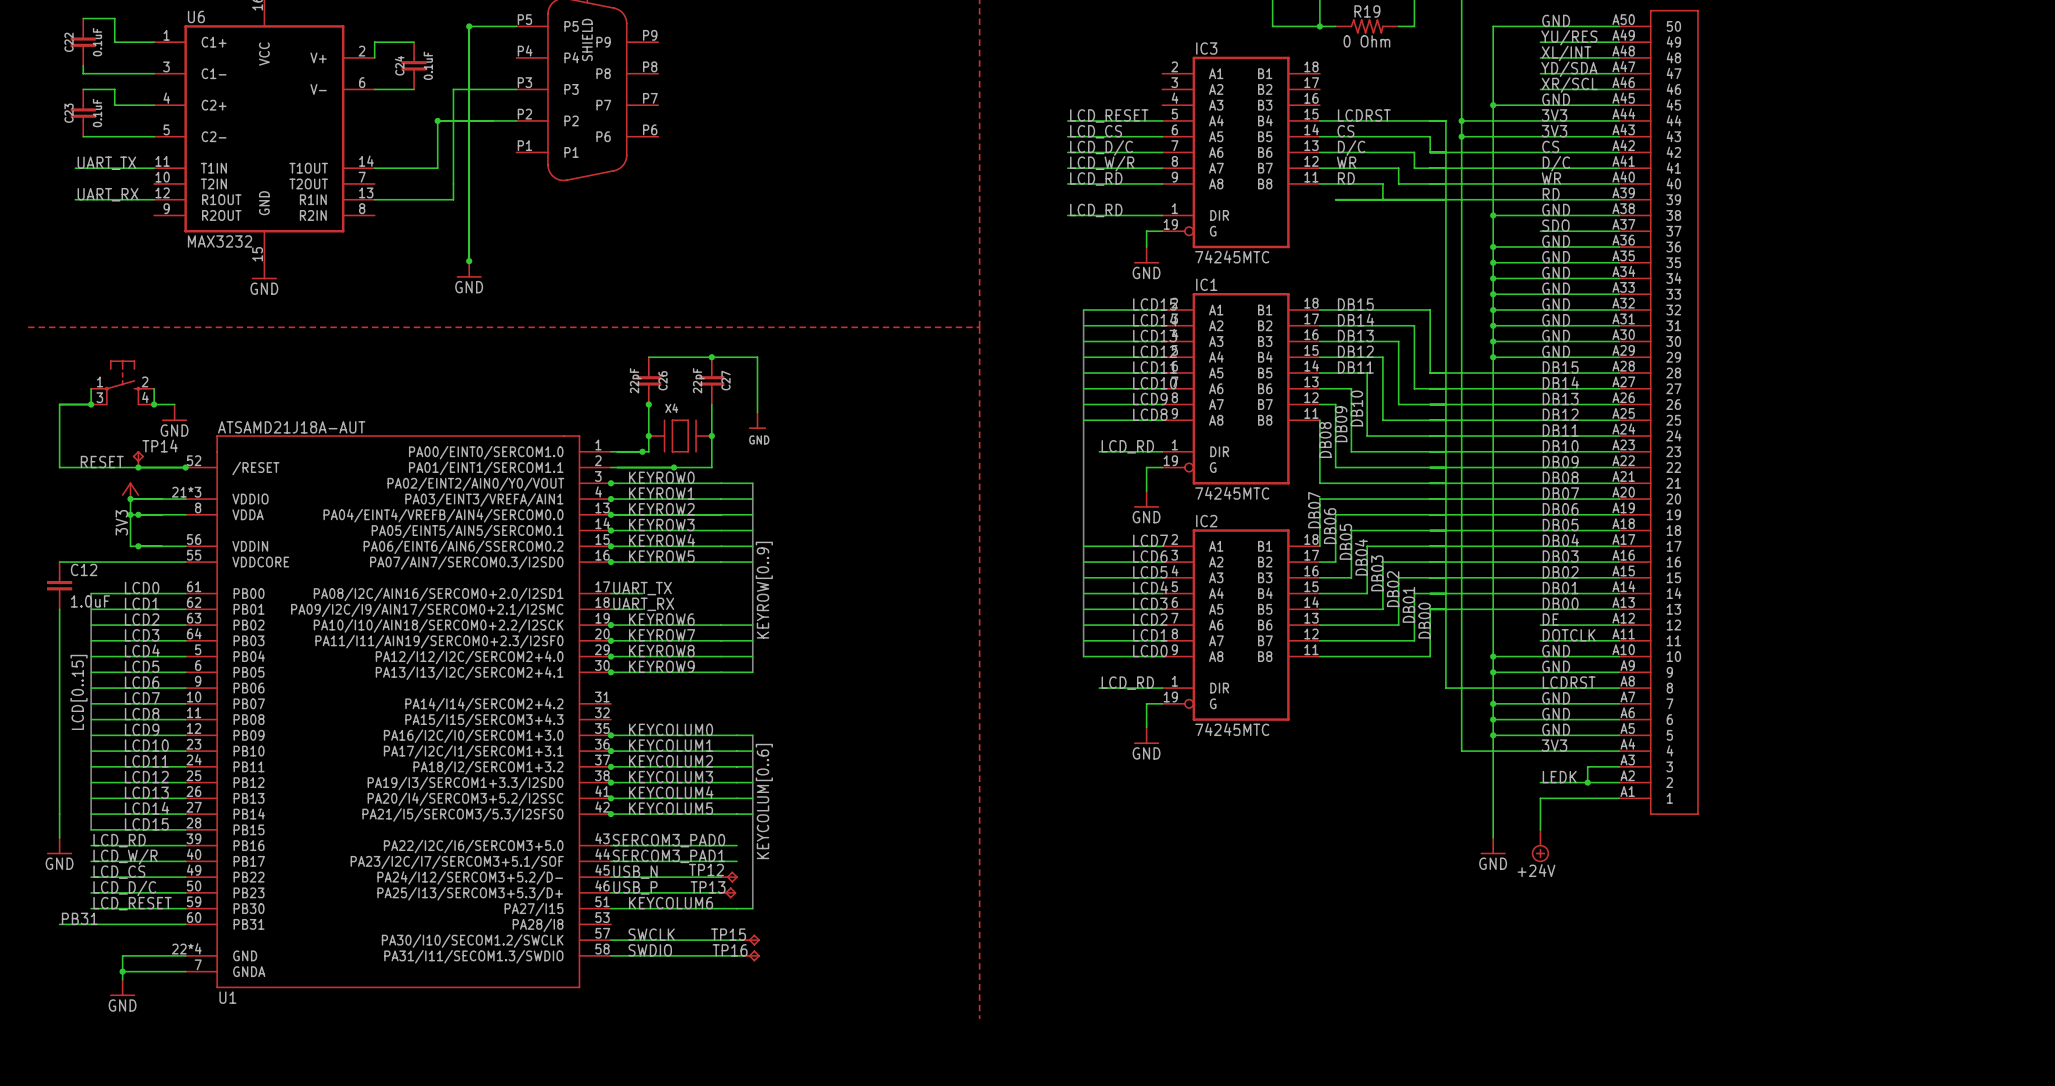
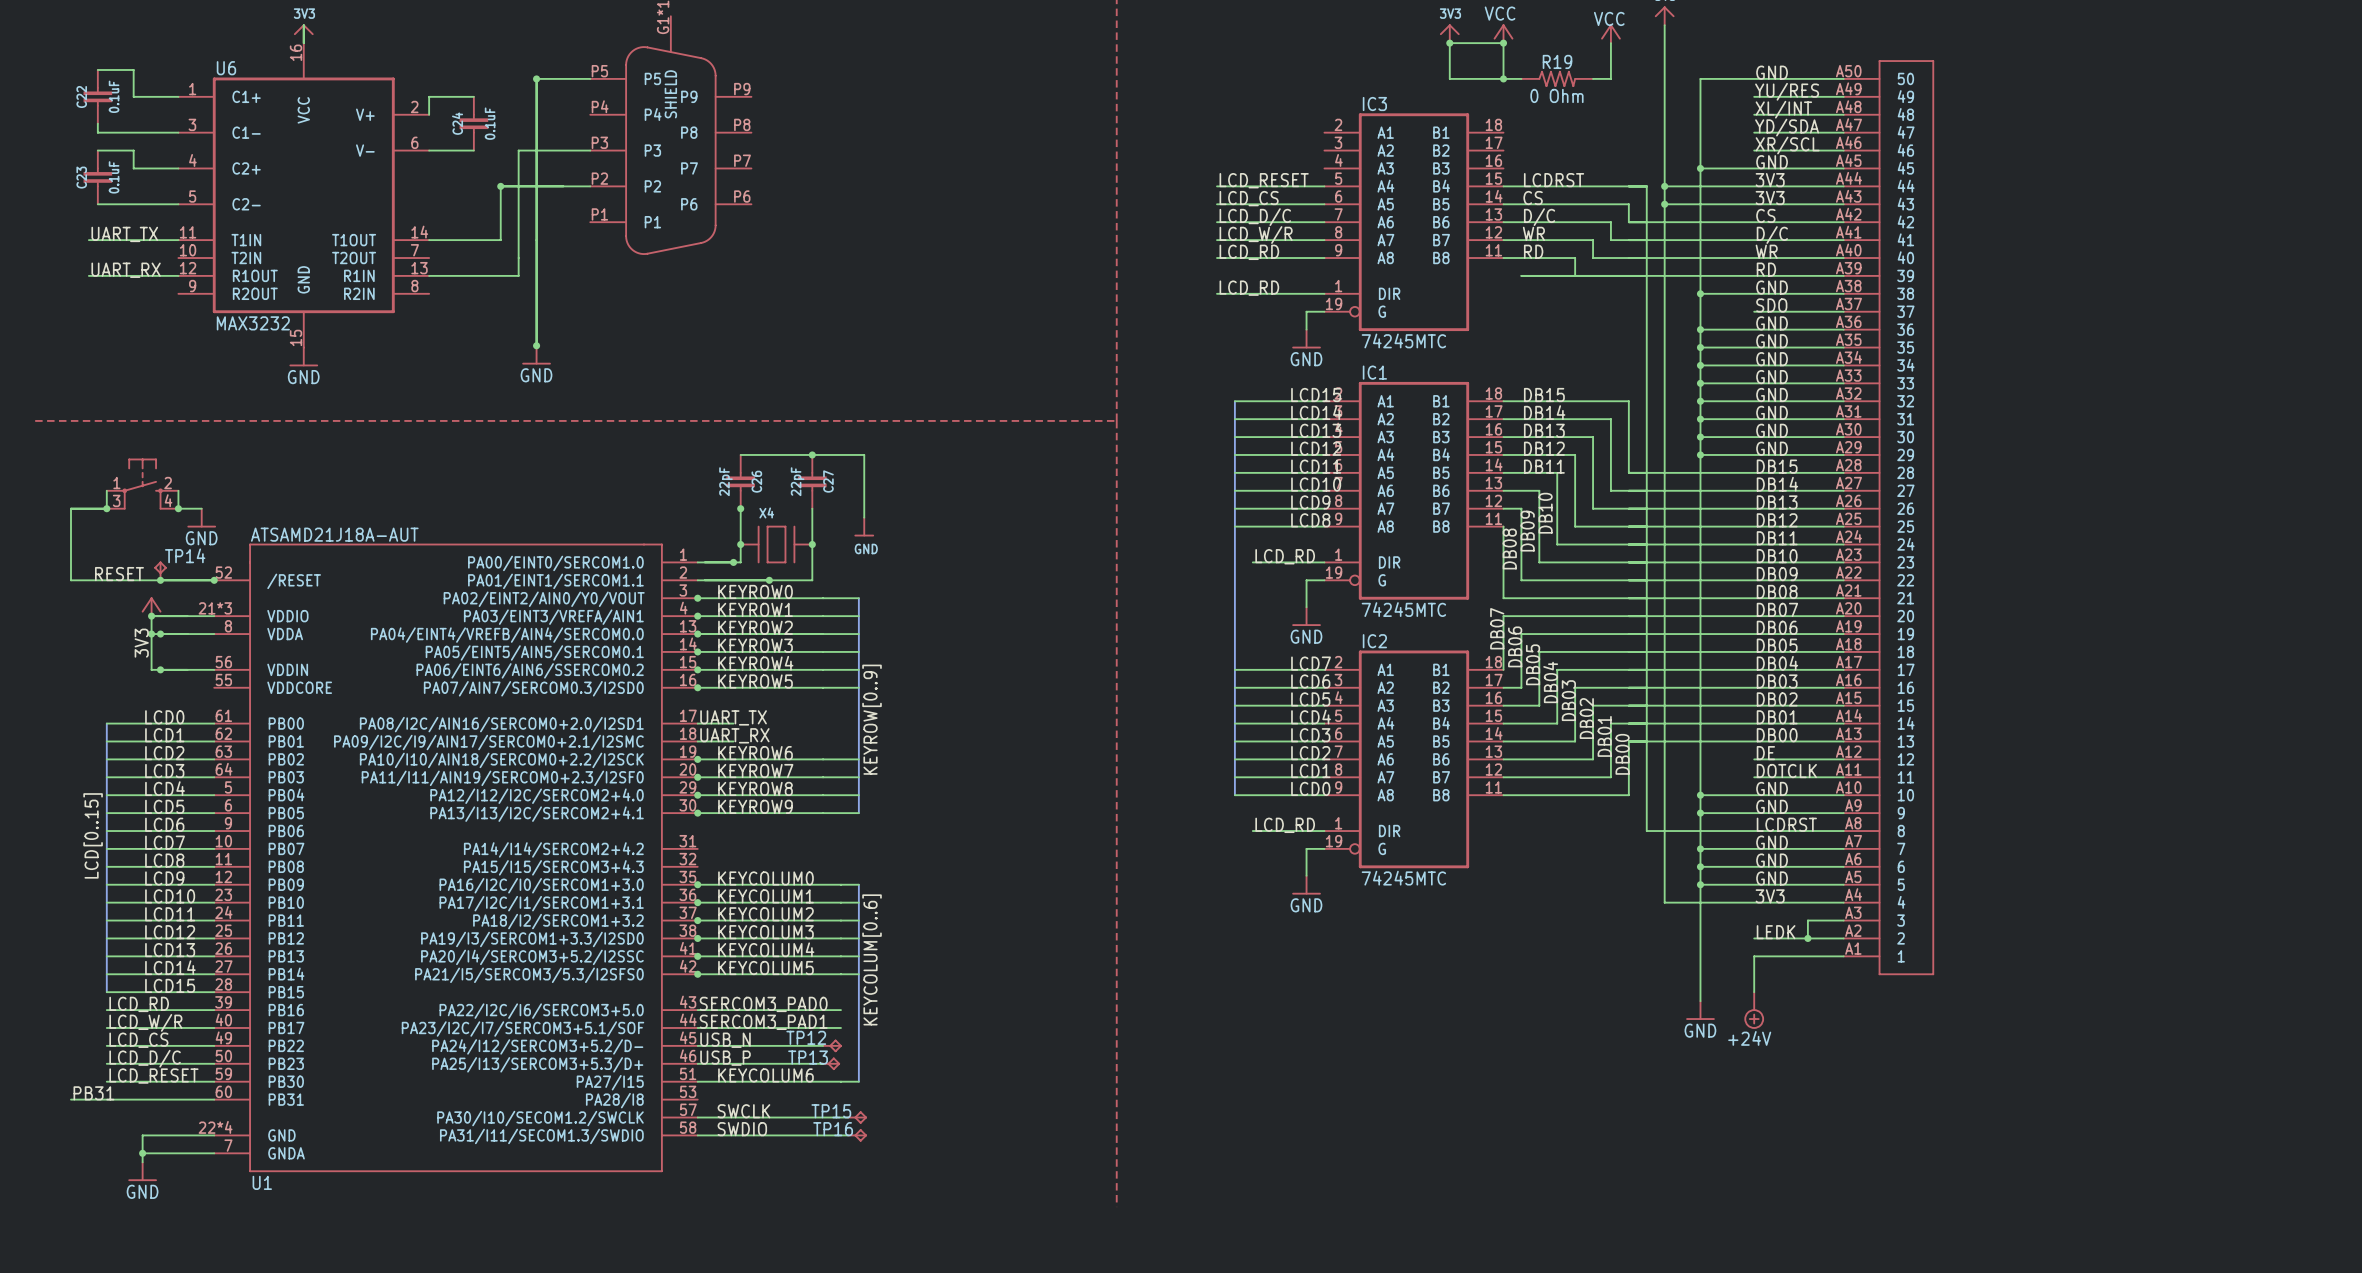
wire: (59, 562) (185, 562) -> none
C12: 1.0uF (59, 585) -> none
wire: (59, 609) (59, 837) -> none
power symbol: GND (59, 846) -> none

